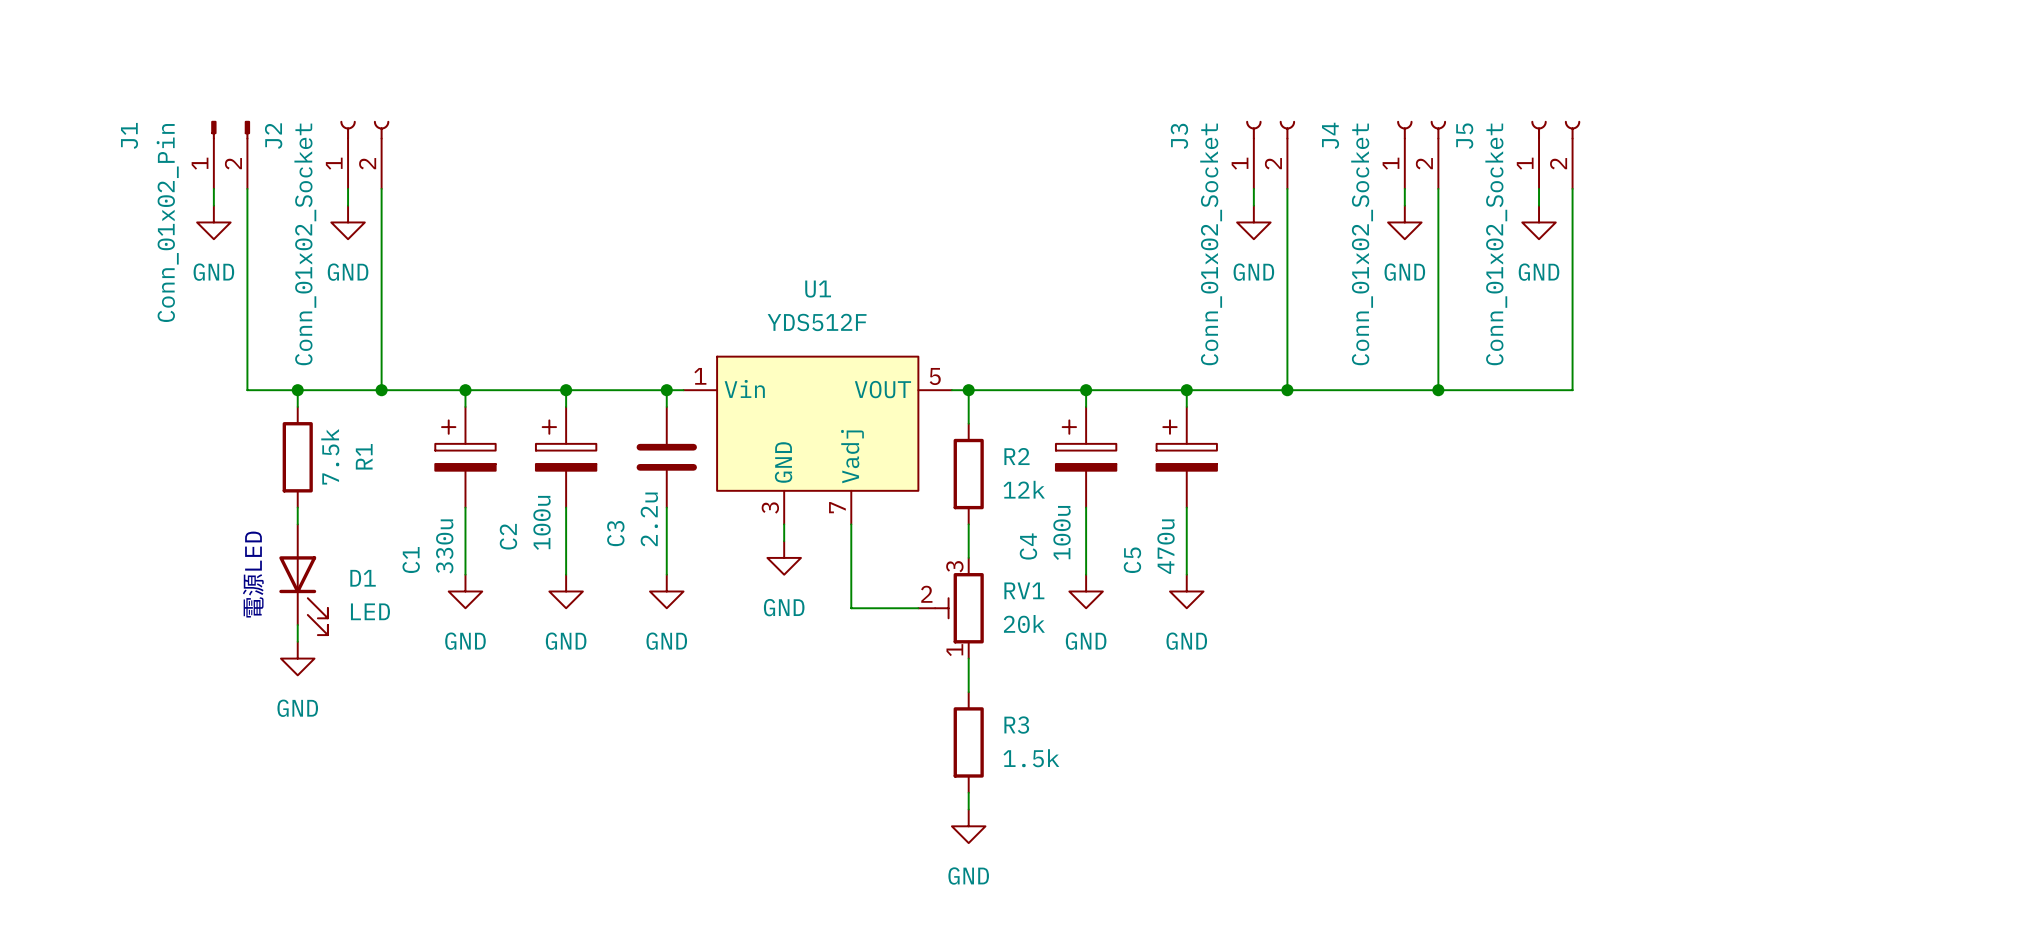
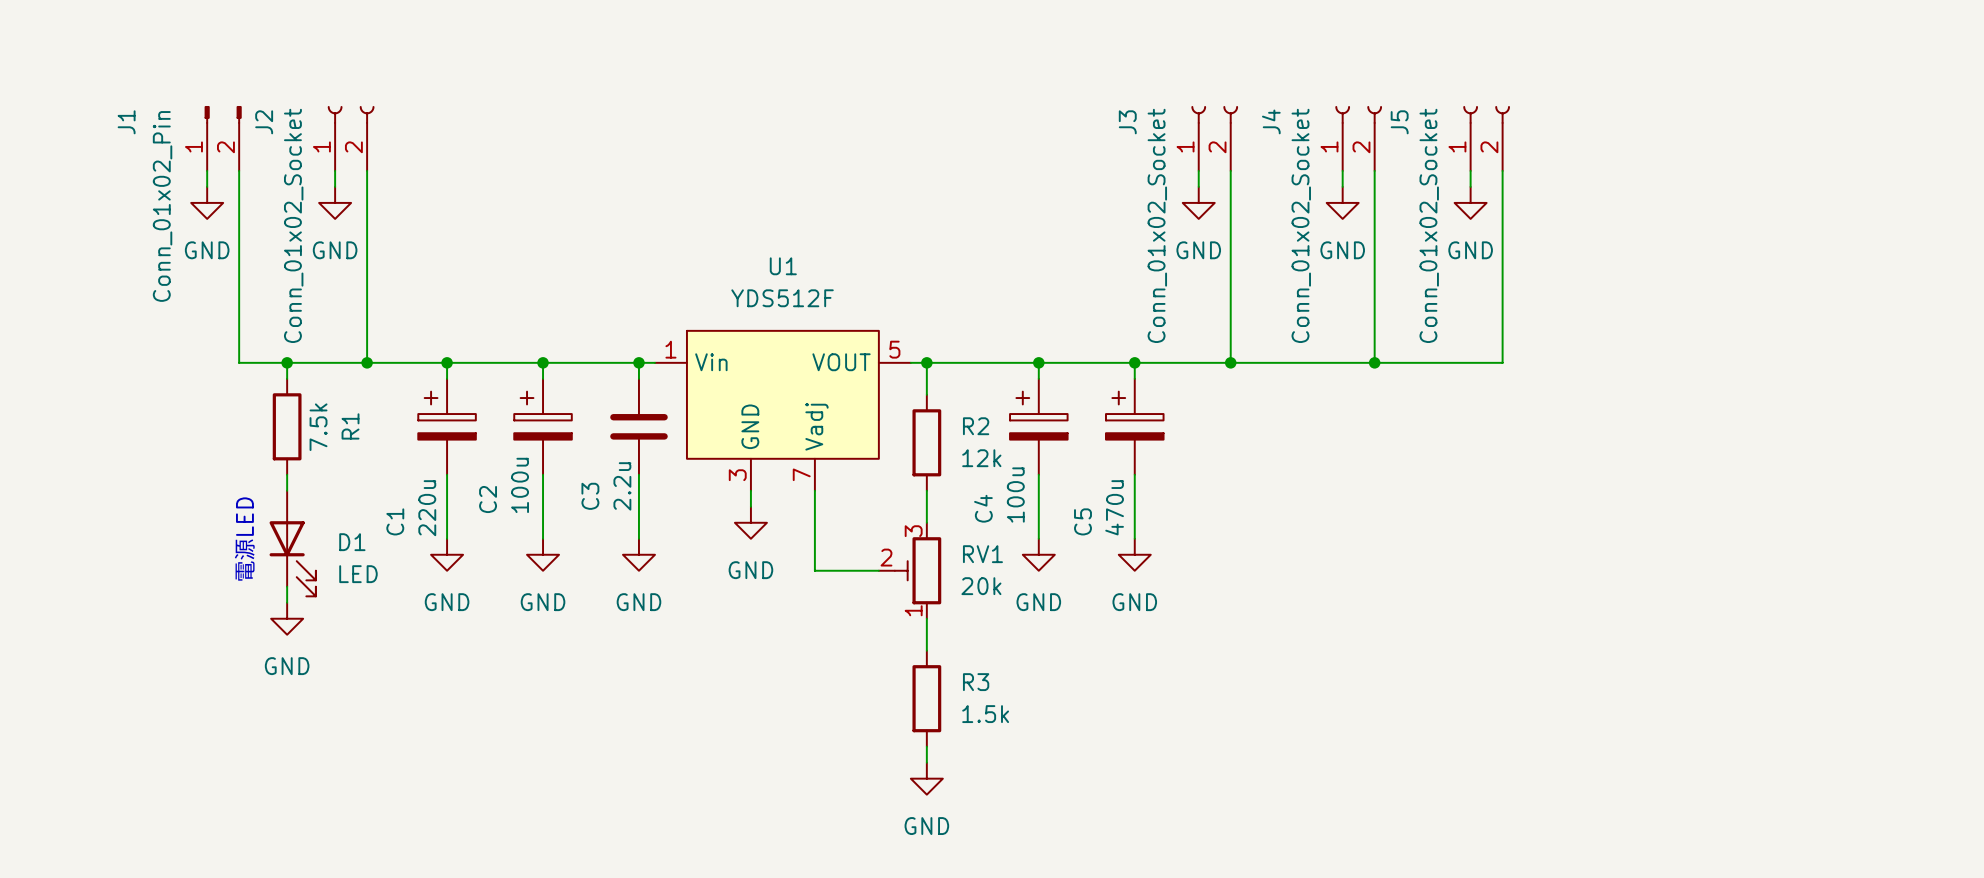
C1 value: 330u (444, 546) -> 220u (427, 508)

